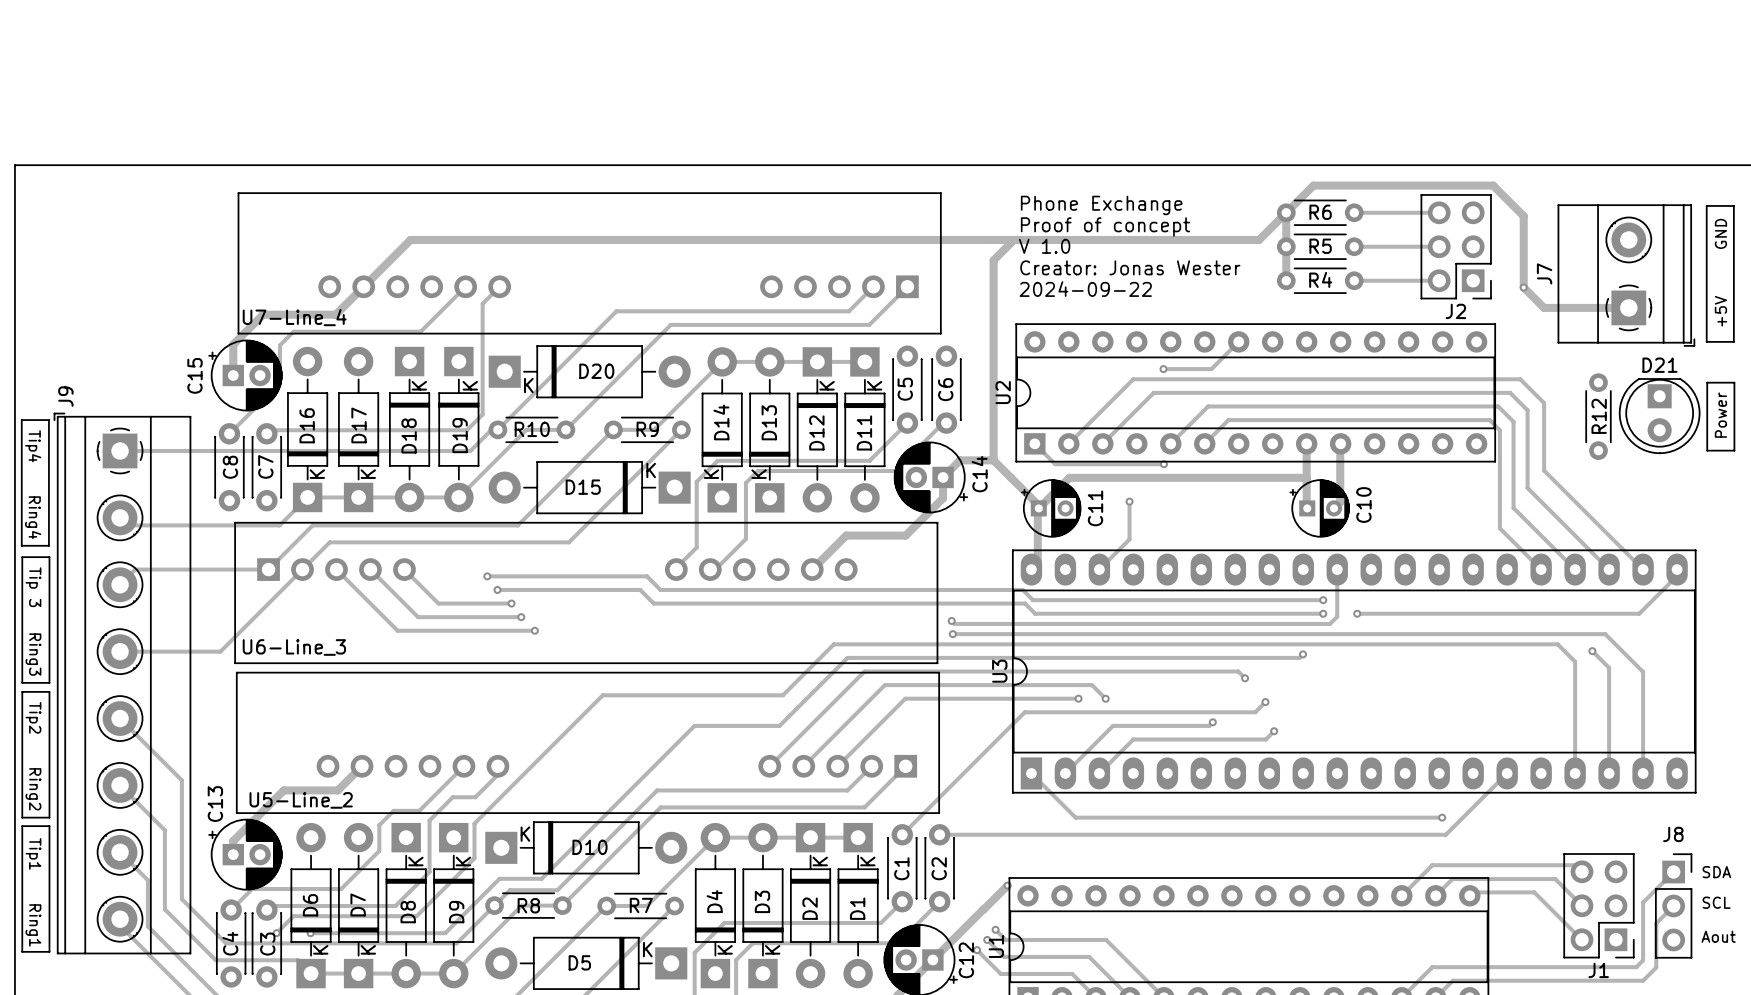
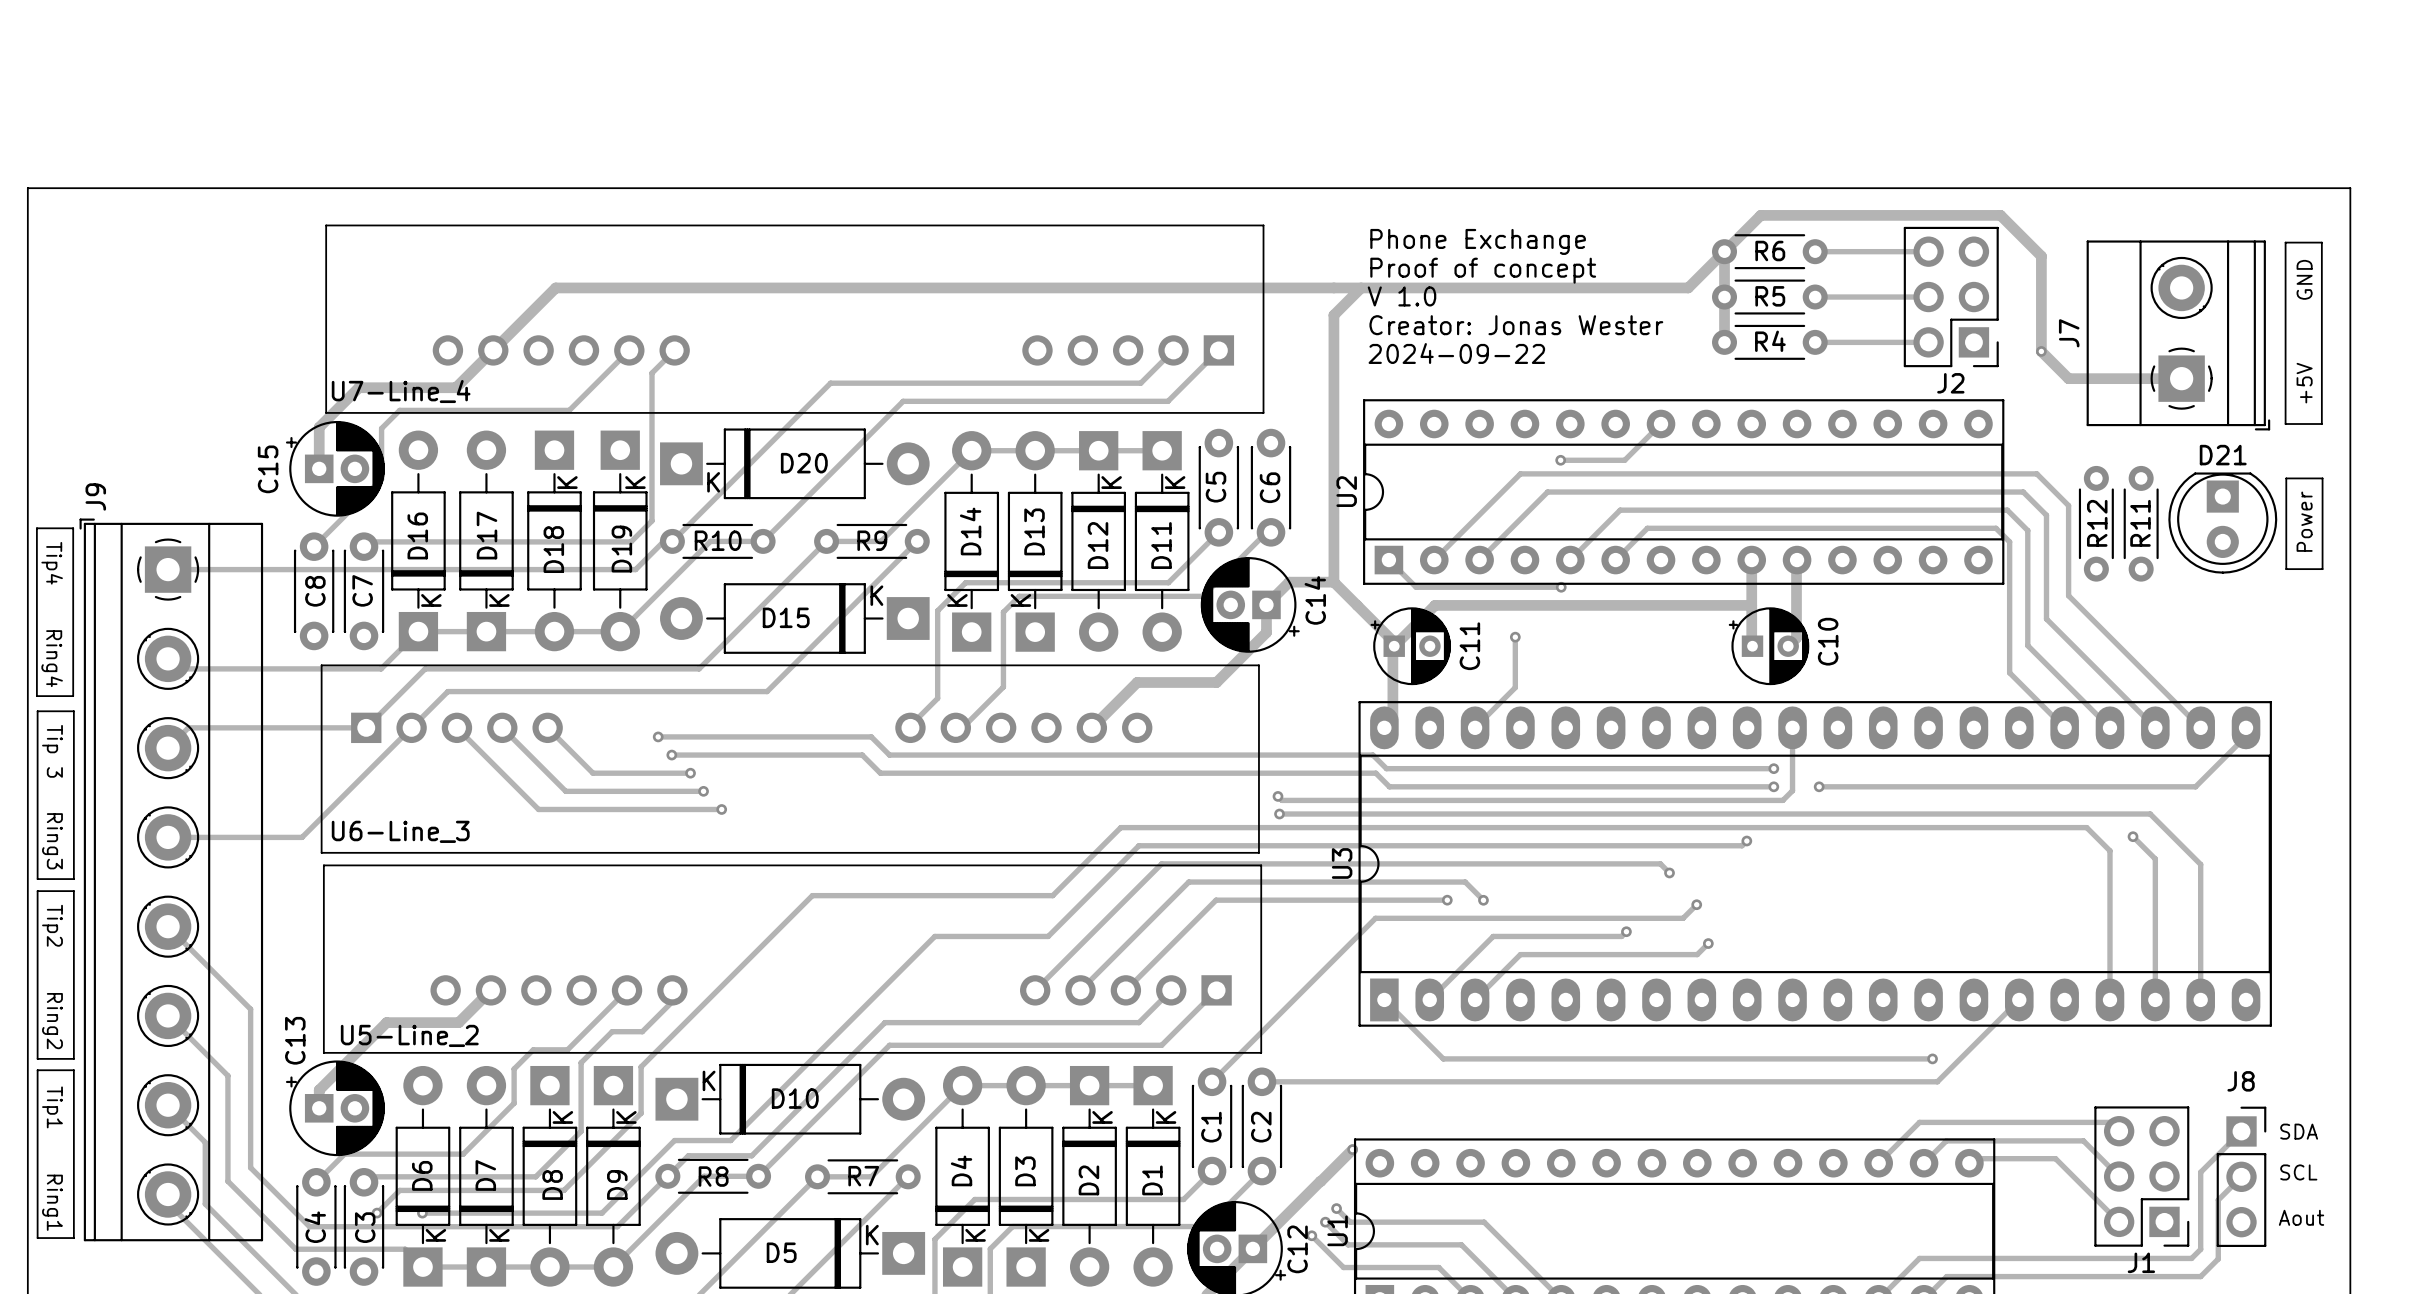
R12: none -> (2096, 523)
R12 name: R12 (1599, 416) -> R11 (2140, 523)

